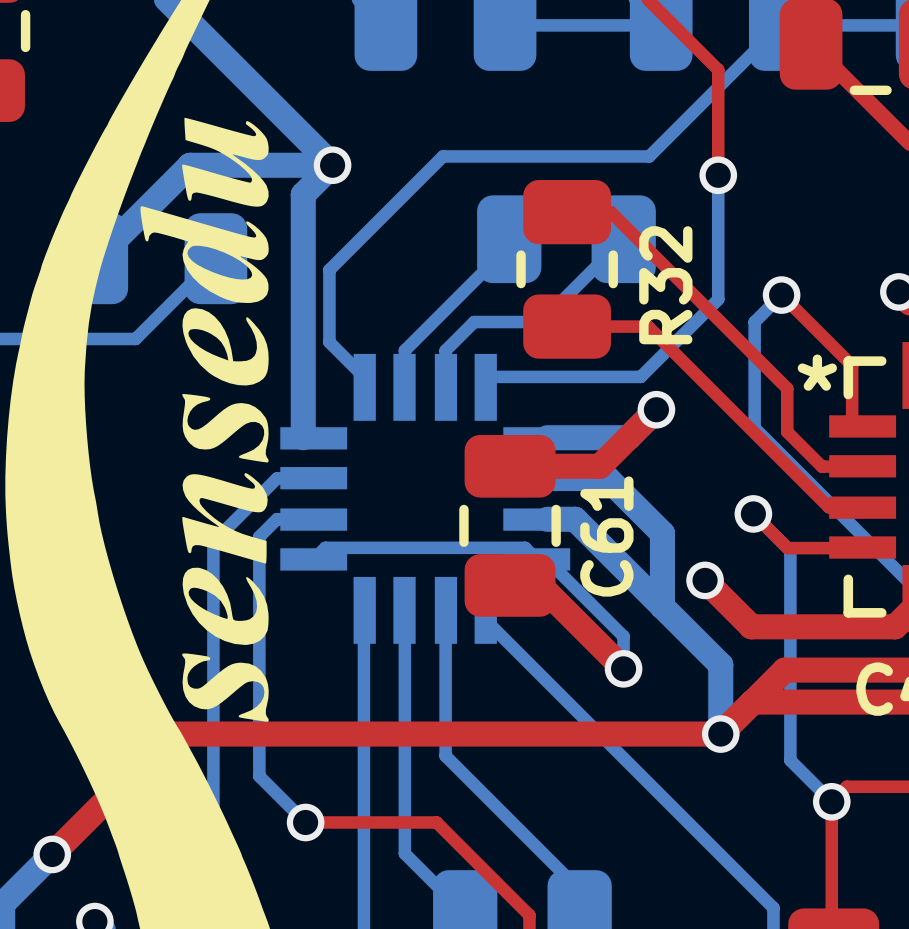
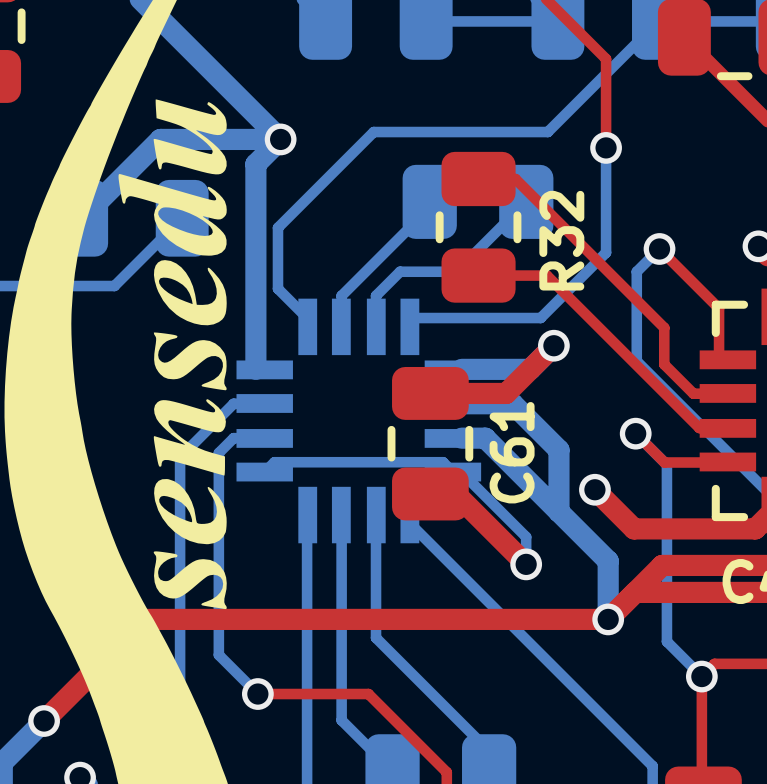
part text: * (817, 372) -> none

